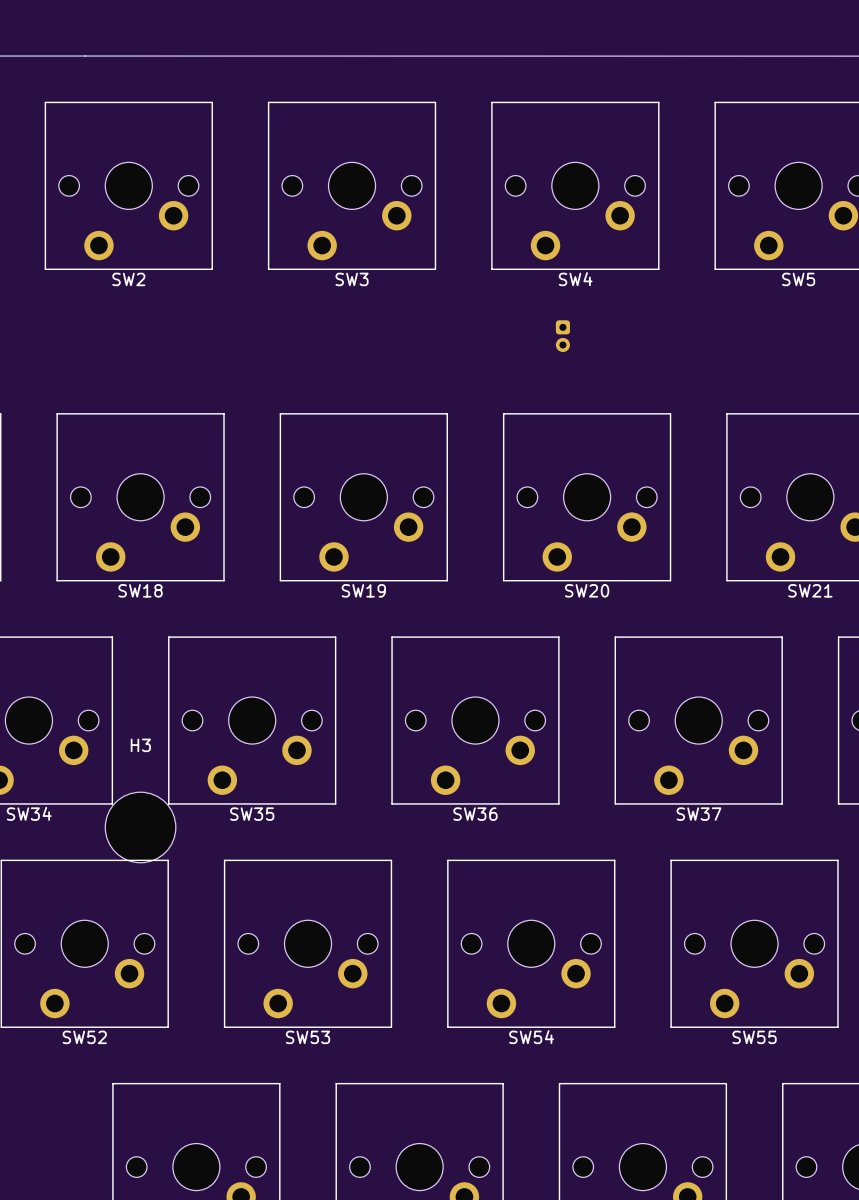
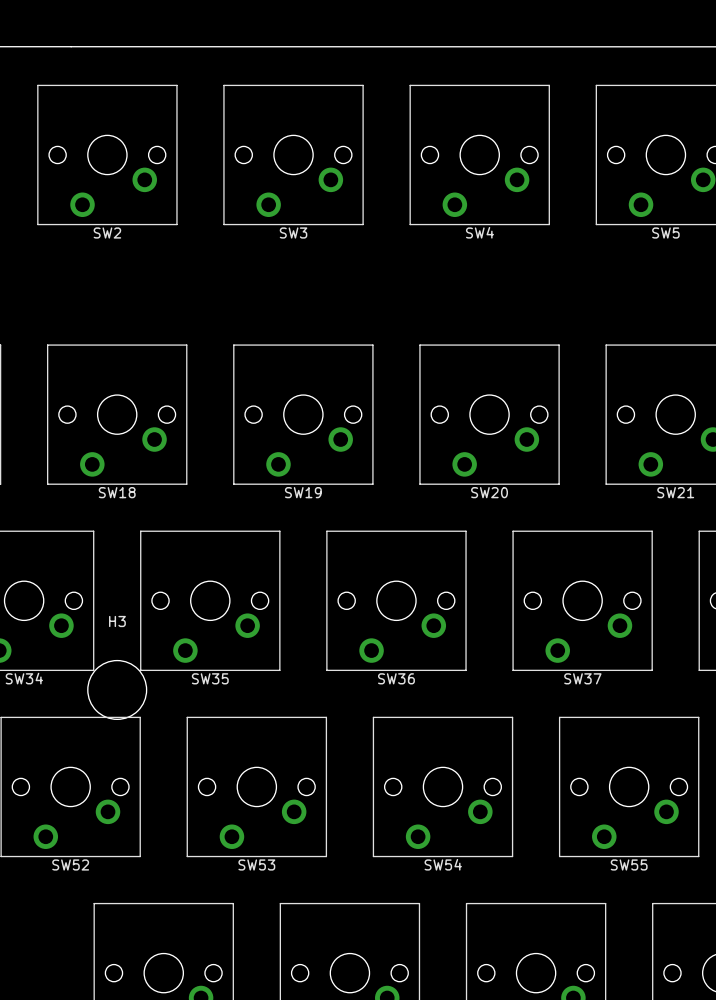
part: (562, 336) -> none

